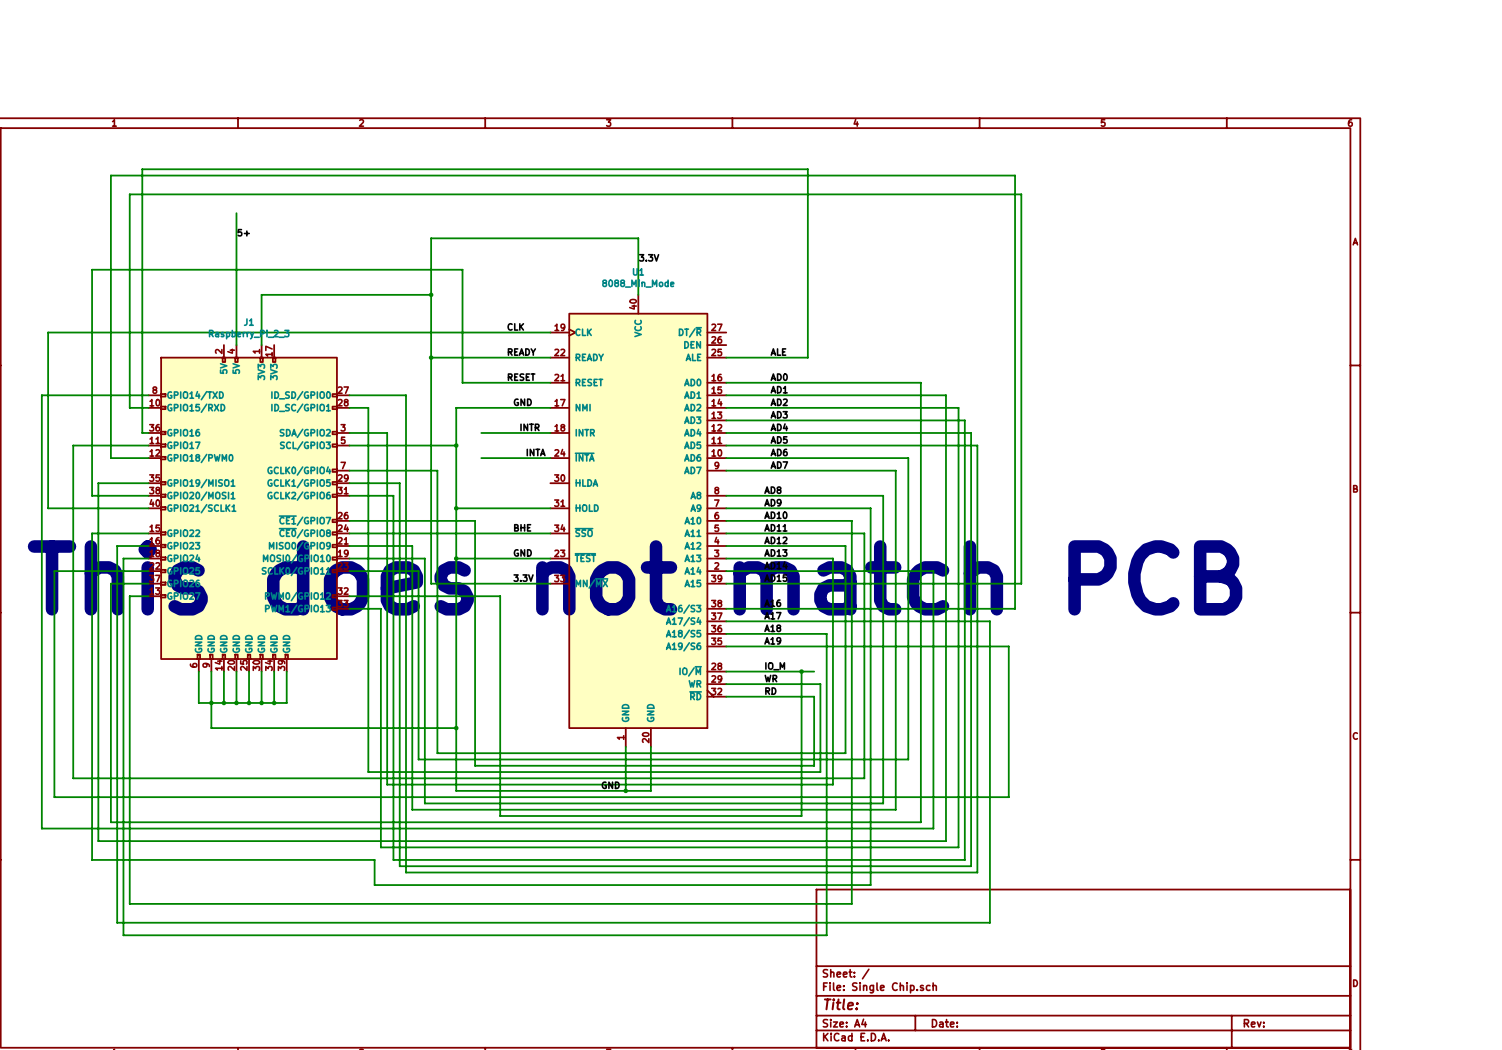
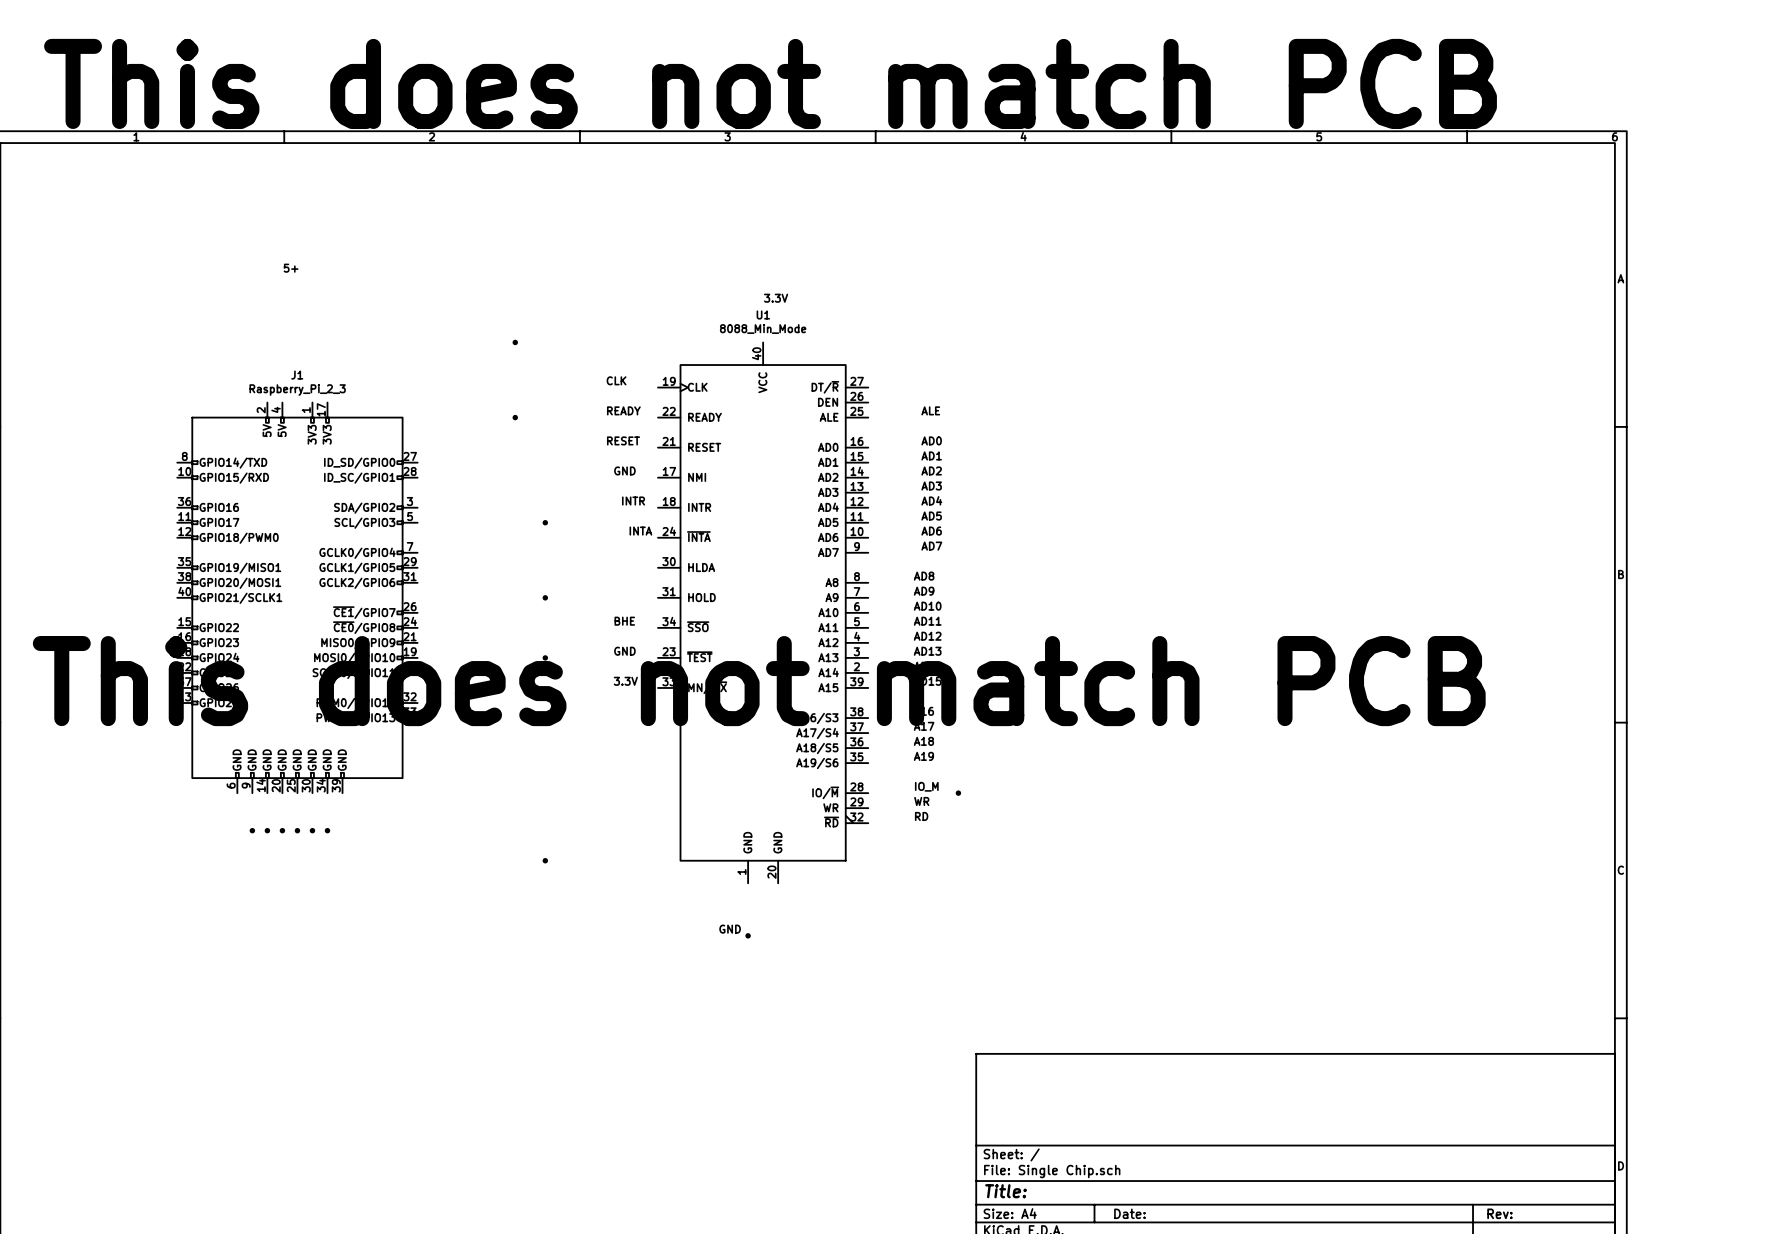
text: none -> This does not match PCB (770, 83)
wire: (236, 213) (236, 345) -> none
wire: (431, 294) (261, 294) (261, 345) -> none
wire: (638, 294) (638, 238) (431, 238) (431, 583) (550, 583) -> none
wire: (550, 332) (48, 332) (48, 508) (148, 508) -> none
wire: (431, 357) (550, 357) -> none
wire: (726, 357) (807, 357) (807, 169) (142, 169) (142, 432) (148, 432) -> none
wire: (550, 382) (462, 382) (462, 269) (92, 269) (92, 495) (148, 495) -> none
wire: (726, 382) (920, 382) (920, 822) (110, 822) (110, 583) (148, 583) -> none
wire: (148, 395) (41, 395) (41, 828) (933, 828) (933, 571) (726, 571) -> none
wire: (349, 395) (406, 395) (406, 872) (977, 872) (977, 445) (726, 445) -> none
wire: (726, 395) (945, 395) (945, 841) (98, 841) (98, 483) (148, 483) -> none
wire: (148, 407) (129, 407) (129, 194) (1021, 194) (1021, 583) (726, 583) -> none
wire: (349, 407) (368, 407) (368, 772) (820, 772) (820, 684) (726, 684) -> none
wire: (550, 407) (456, 407) (456, 790) (650, 790) (650, 746) -> none
wire: (726, 407) (958, 407) (958, 847) (380, 847) (380, 608) (349, 608) -> none
wire: (726, 420) (964, 420) (964, 859) (393, 859) (393, 495) (349, 495) -> none
wire: (349, 432) (387, 432) (387, 784) (832, 784) (832, 558) (726, 558) -> none
wire: (481, 432) (550, 432) -> none
wire: (726, 432) (971, 432) (971, 866) (399, 866) (399, 483) (349, 483) -> none
wire: (148, 445) (73, 445) (73, 778) (864, 778) (864, 533) (726, 533) -> none
wire: (349, 445) (456, 445) -> none
wire: (148, 458) (110, 458) (110, 175) (1015, 175) (1015, 608) (726, 608) -> none
wire: (481, 458) (550, 458) -> none
wire: (726, 458) (908, 458) (908, 759) (418, 759) (418, 571) (349, 571) -> none
wire: (349, 470) (437, 470) (437, 753) (845, 753) (845, 546) (726, 546) -> none
wire: (726, 470) (895, 470) (895, 809) (412, 809) (412, 546) (349, 546) -> none
wire: (726, 495) (883, 495) (883, 803) (424, 803) (424, 558) (349, 558) -> none
wire: (456, 508) (550, 508) -> none
wire: (726, 508) (870, 508) (870, 885) (374, 885) (374, 859) (92, 859) (92, 533) (148, 533) -> none
wire: (349, 520) (475, 520) (475, 765) (814, 765) (814, 696) (726, 696) -> none
wire: (726, 520) (851, 520) (851, 903) (129, 903) (129, 596) (148, 596) -> none
wire: (349, 533) (550, 533) -> none
wire: (148, 546) (117, 546) (117, 922) (989, 922) (989, 621) (726, 621) -> none
wire: (148, 558) (123, 558) (123, 935) (826, 935) (826, 633) (726, 633) -> none
wire: (456, 558) (550, 558) -> none
wire: (148, 571) (54, 571) (54, 797) (1008, 797) (1008, 646) (726, 646) -> none
wire: (349, 596) (500, 596) (500, 815) (801, 815) (801, 671) -> none
wire: (198, 671) (198, 702) (286, 702) (286, 671) -> none
wire: (211, 671) (211, 728) (456, 728) -> none
wire: (223, 671) (223, 702) -> none
wire: (236, 671) (236, 702) -> none
wire: (249, 671) (249, 702) -> none
wire: (261, 671) (261, 702) -> none
wire: (274, 671) (274, 702) -> none
wire: (726, 671) (814, 671) -> none
wire: (625, 746) (625, 790) -> none

